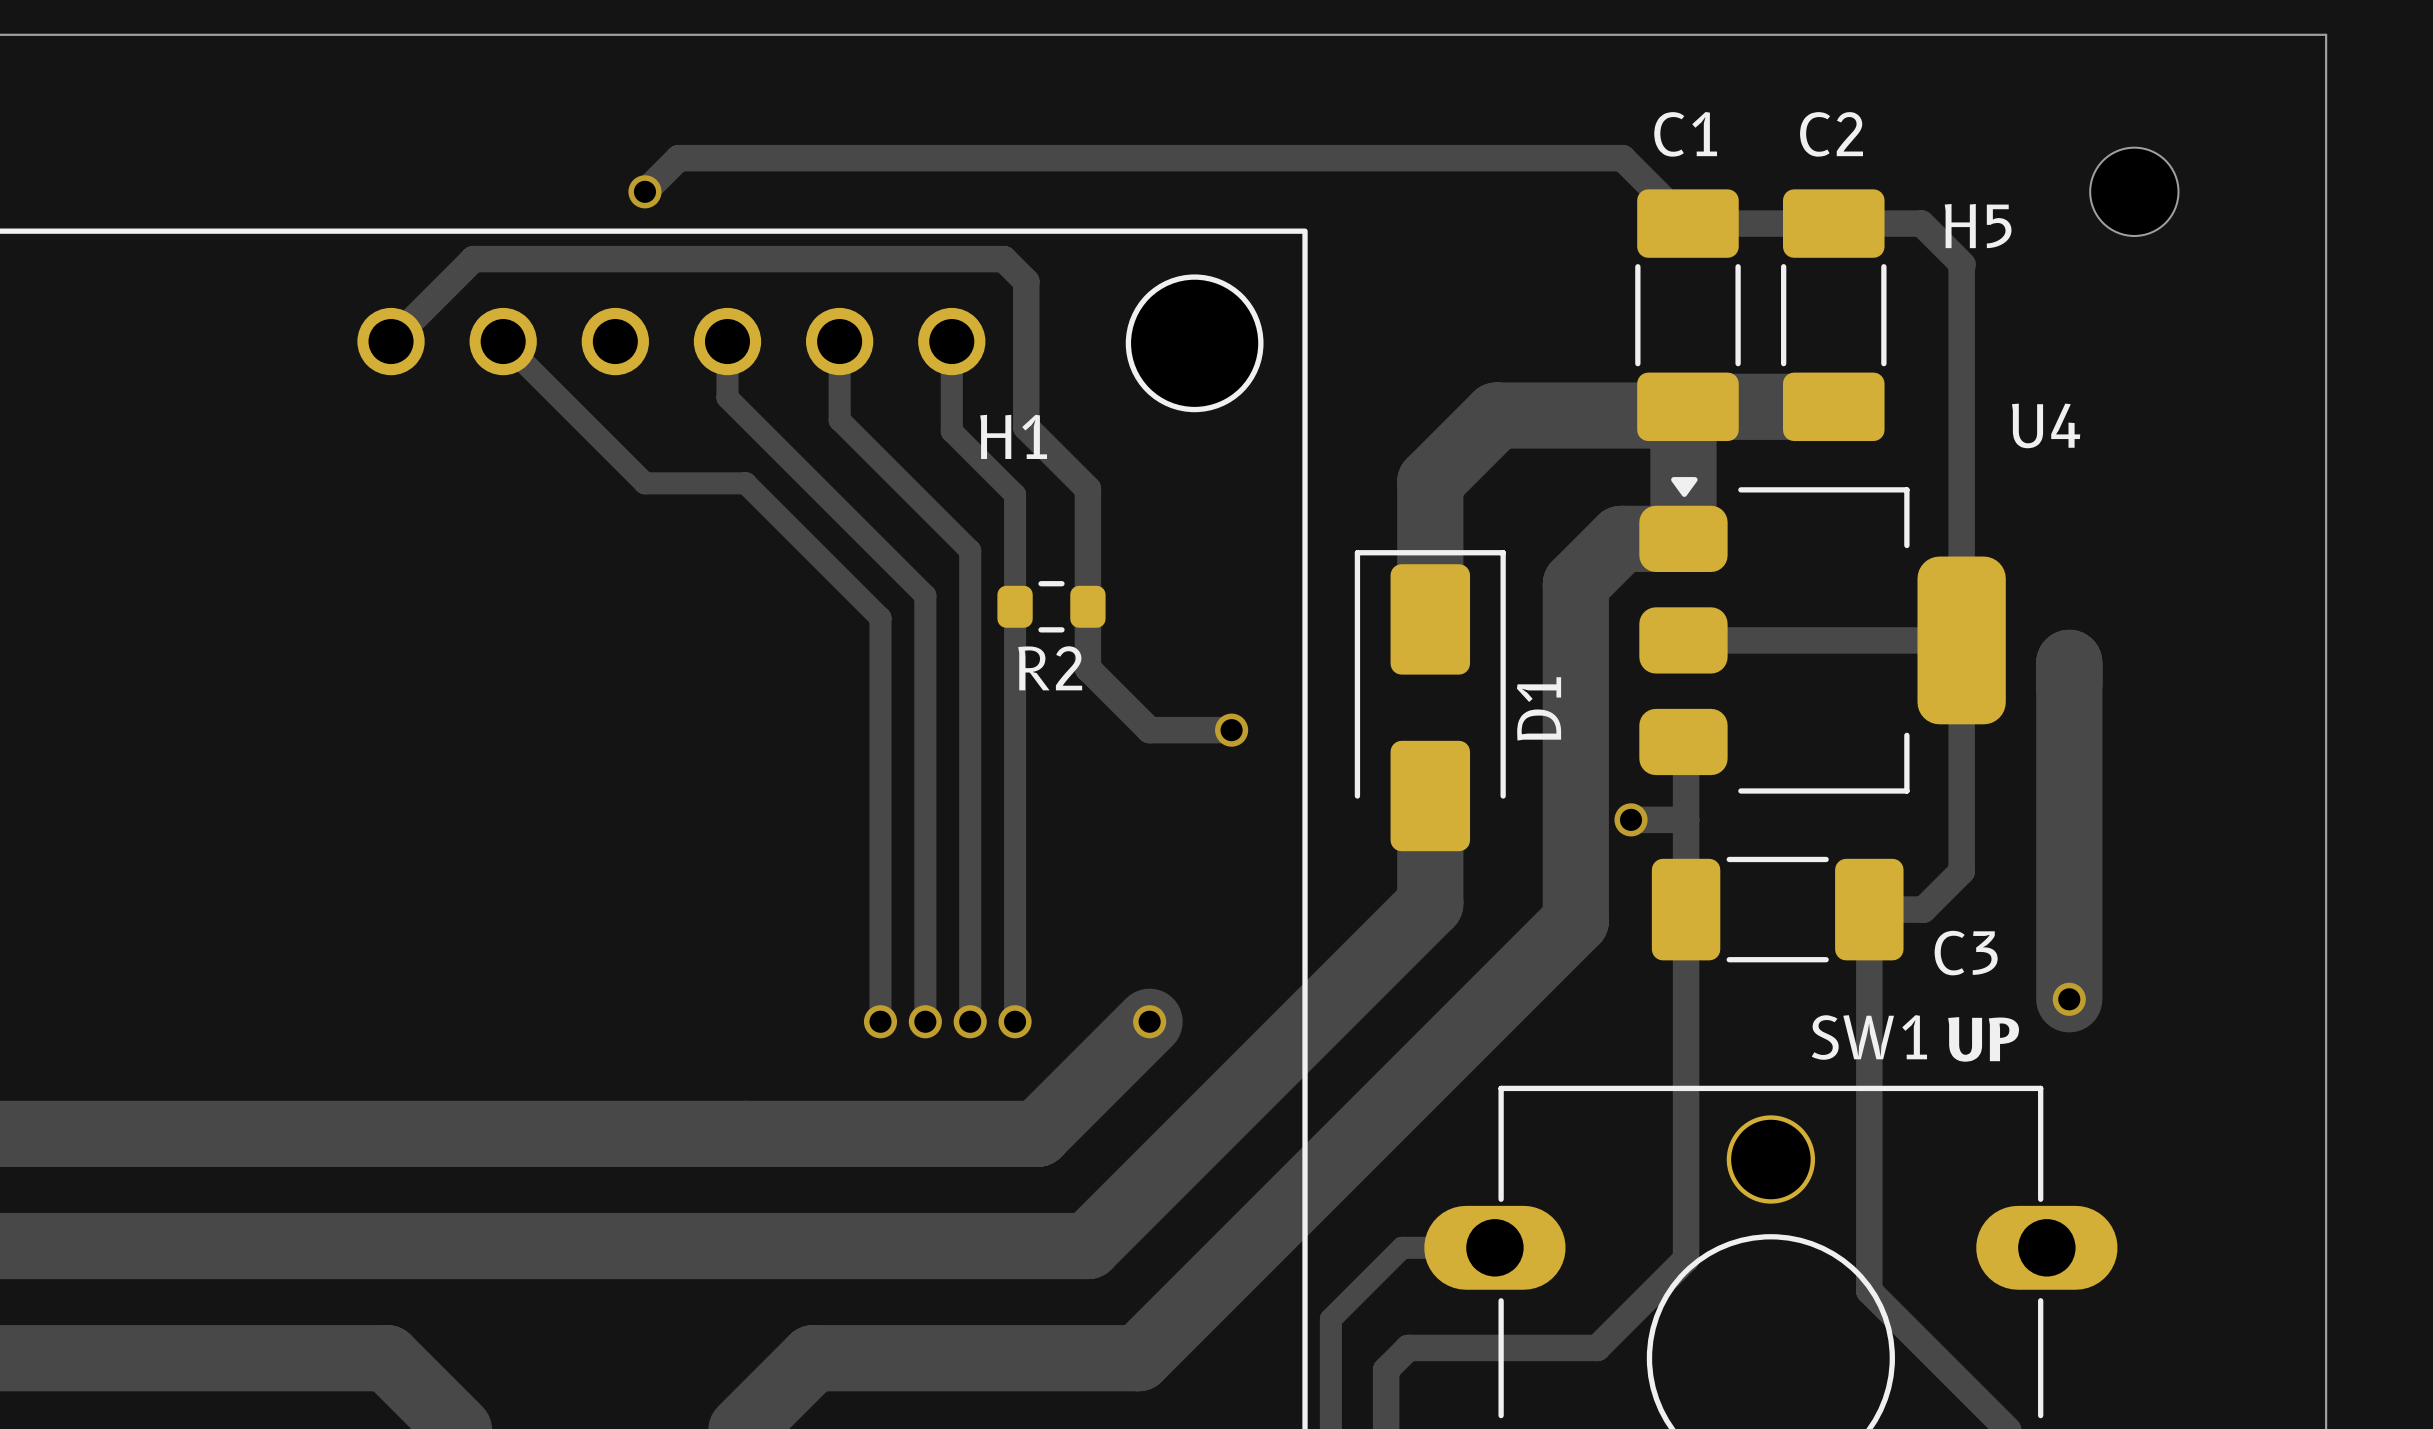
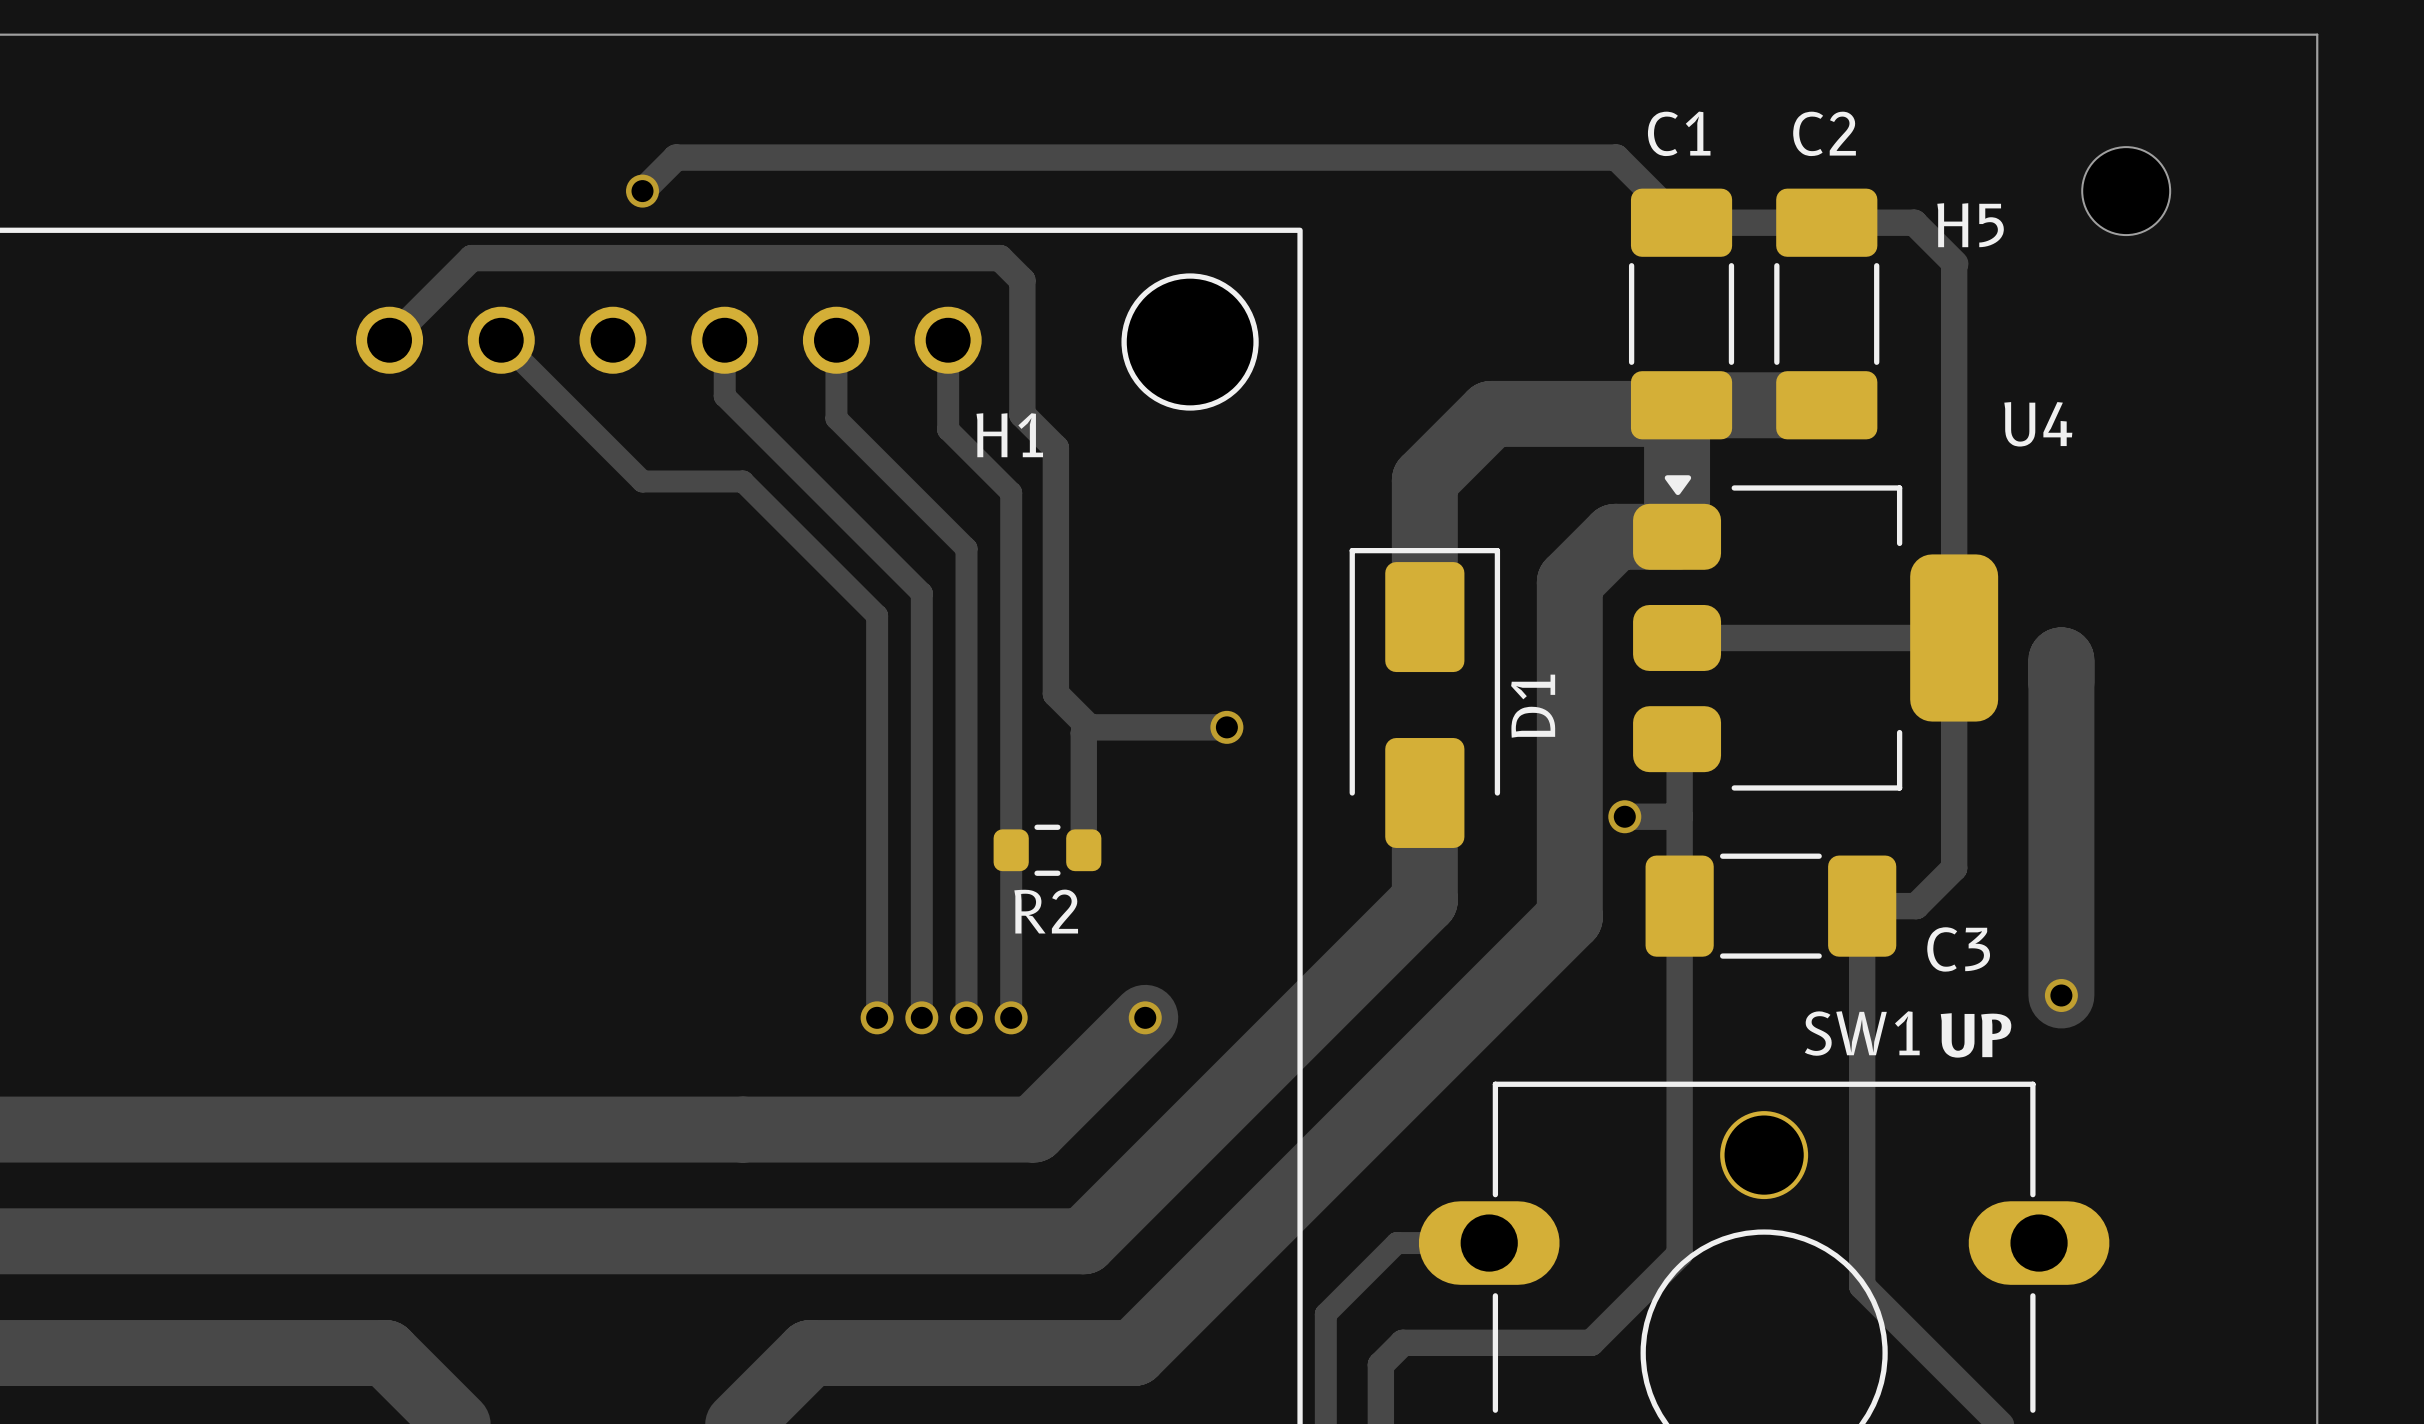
track: (1026, 416) (1026, 427) (1087, 488) (1087, 668) (1149, 730) -> (1022, 414) (1055, 448) (1055, 693) (1089, 727)
R2 position: (1051, 606) -> (1047, 850)
track: none -> (1089, 727) (1145, 727)
track: none -> (1089, 727) (1083, 732) (1083, 850)

